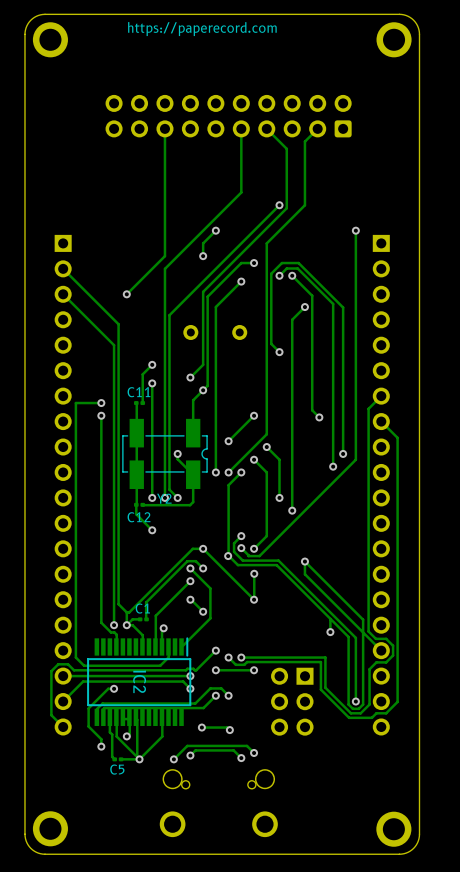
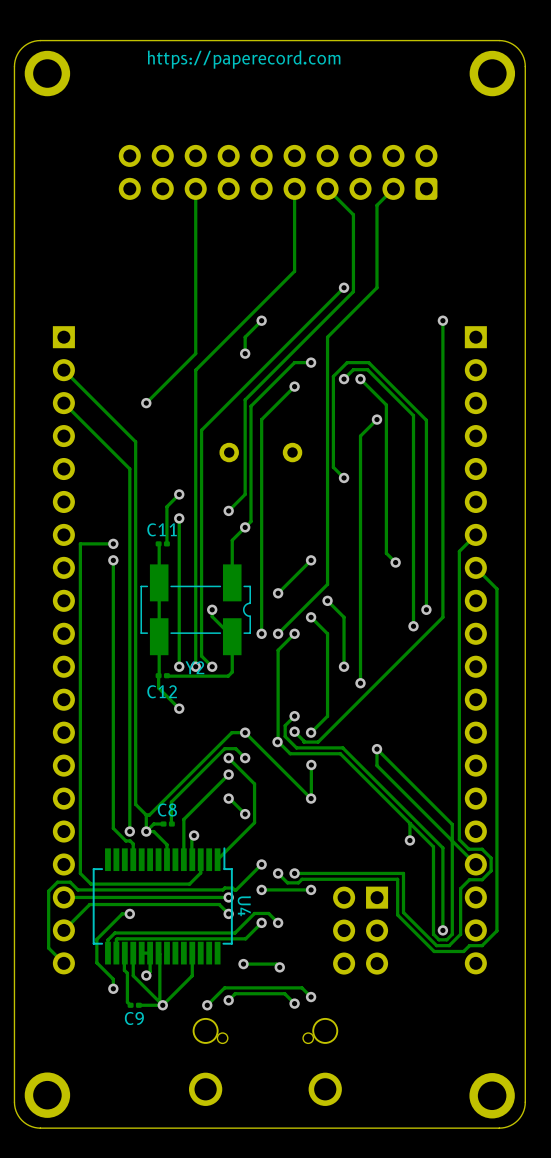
C1 name: C1 (142, 608) -> C8 (167, 809)
IC2: (139, 681) -> none
U4: none -> (162, 905)
C5 name: C5 (117, 769) -> C9 (134, 1018)

